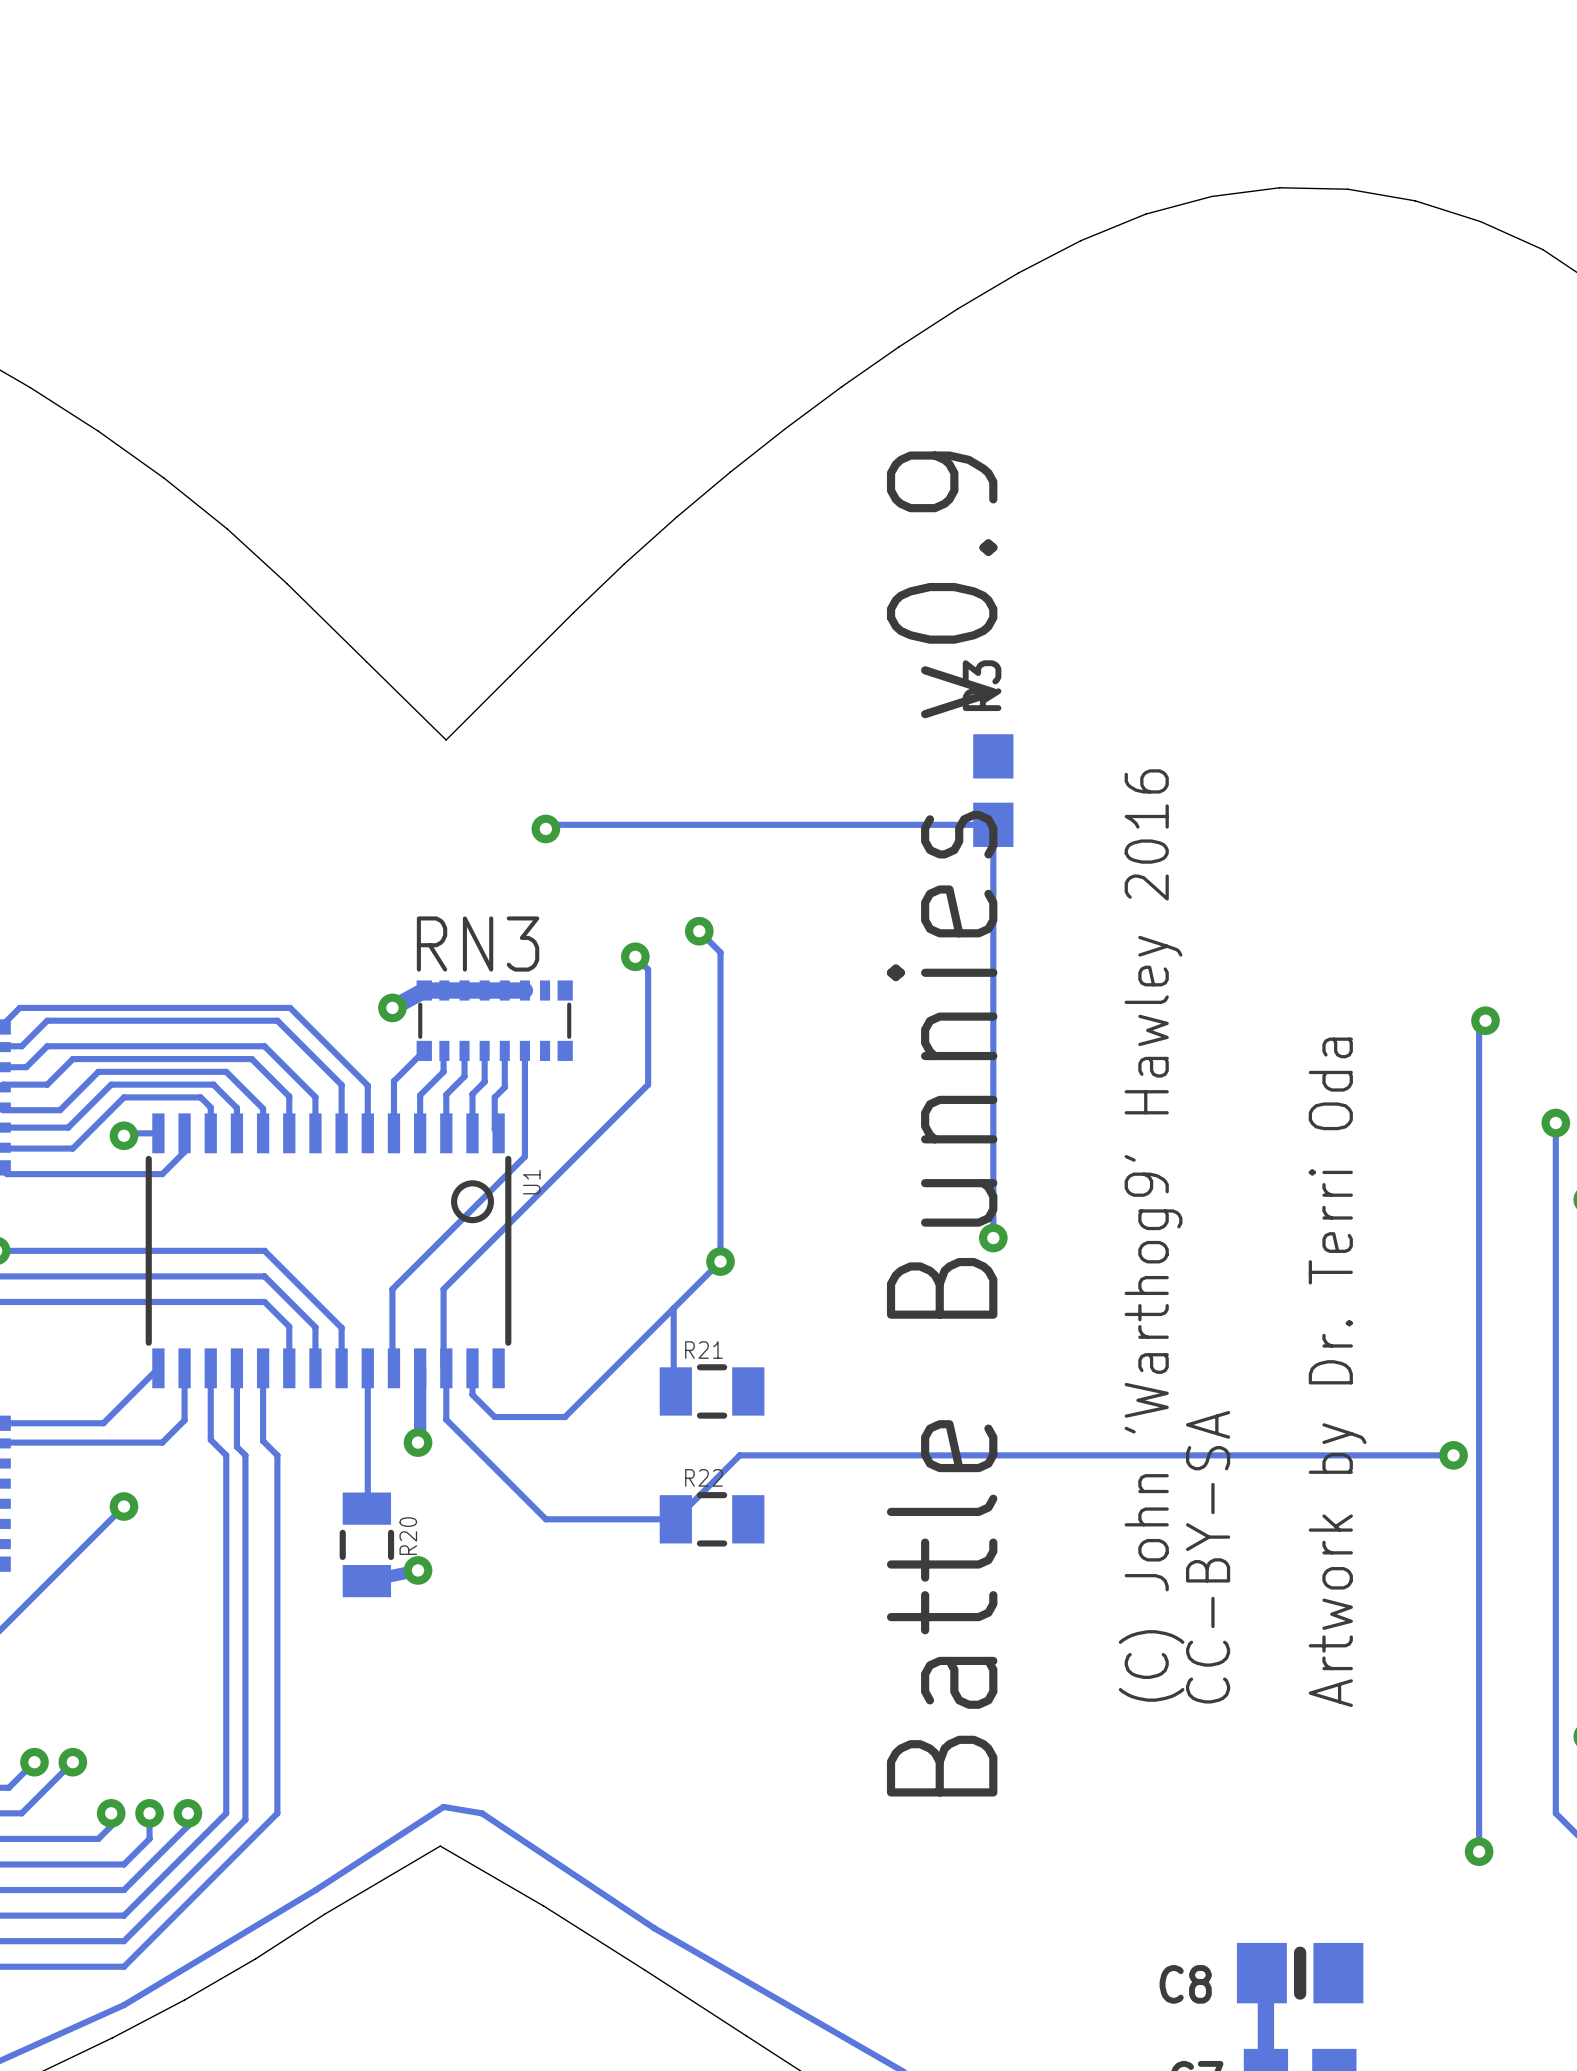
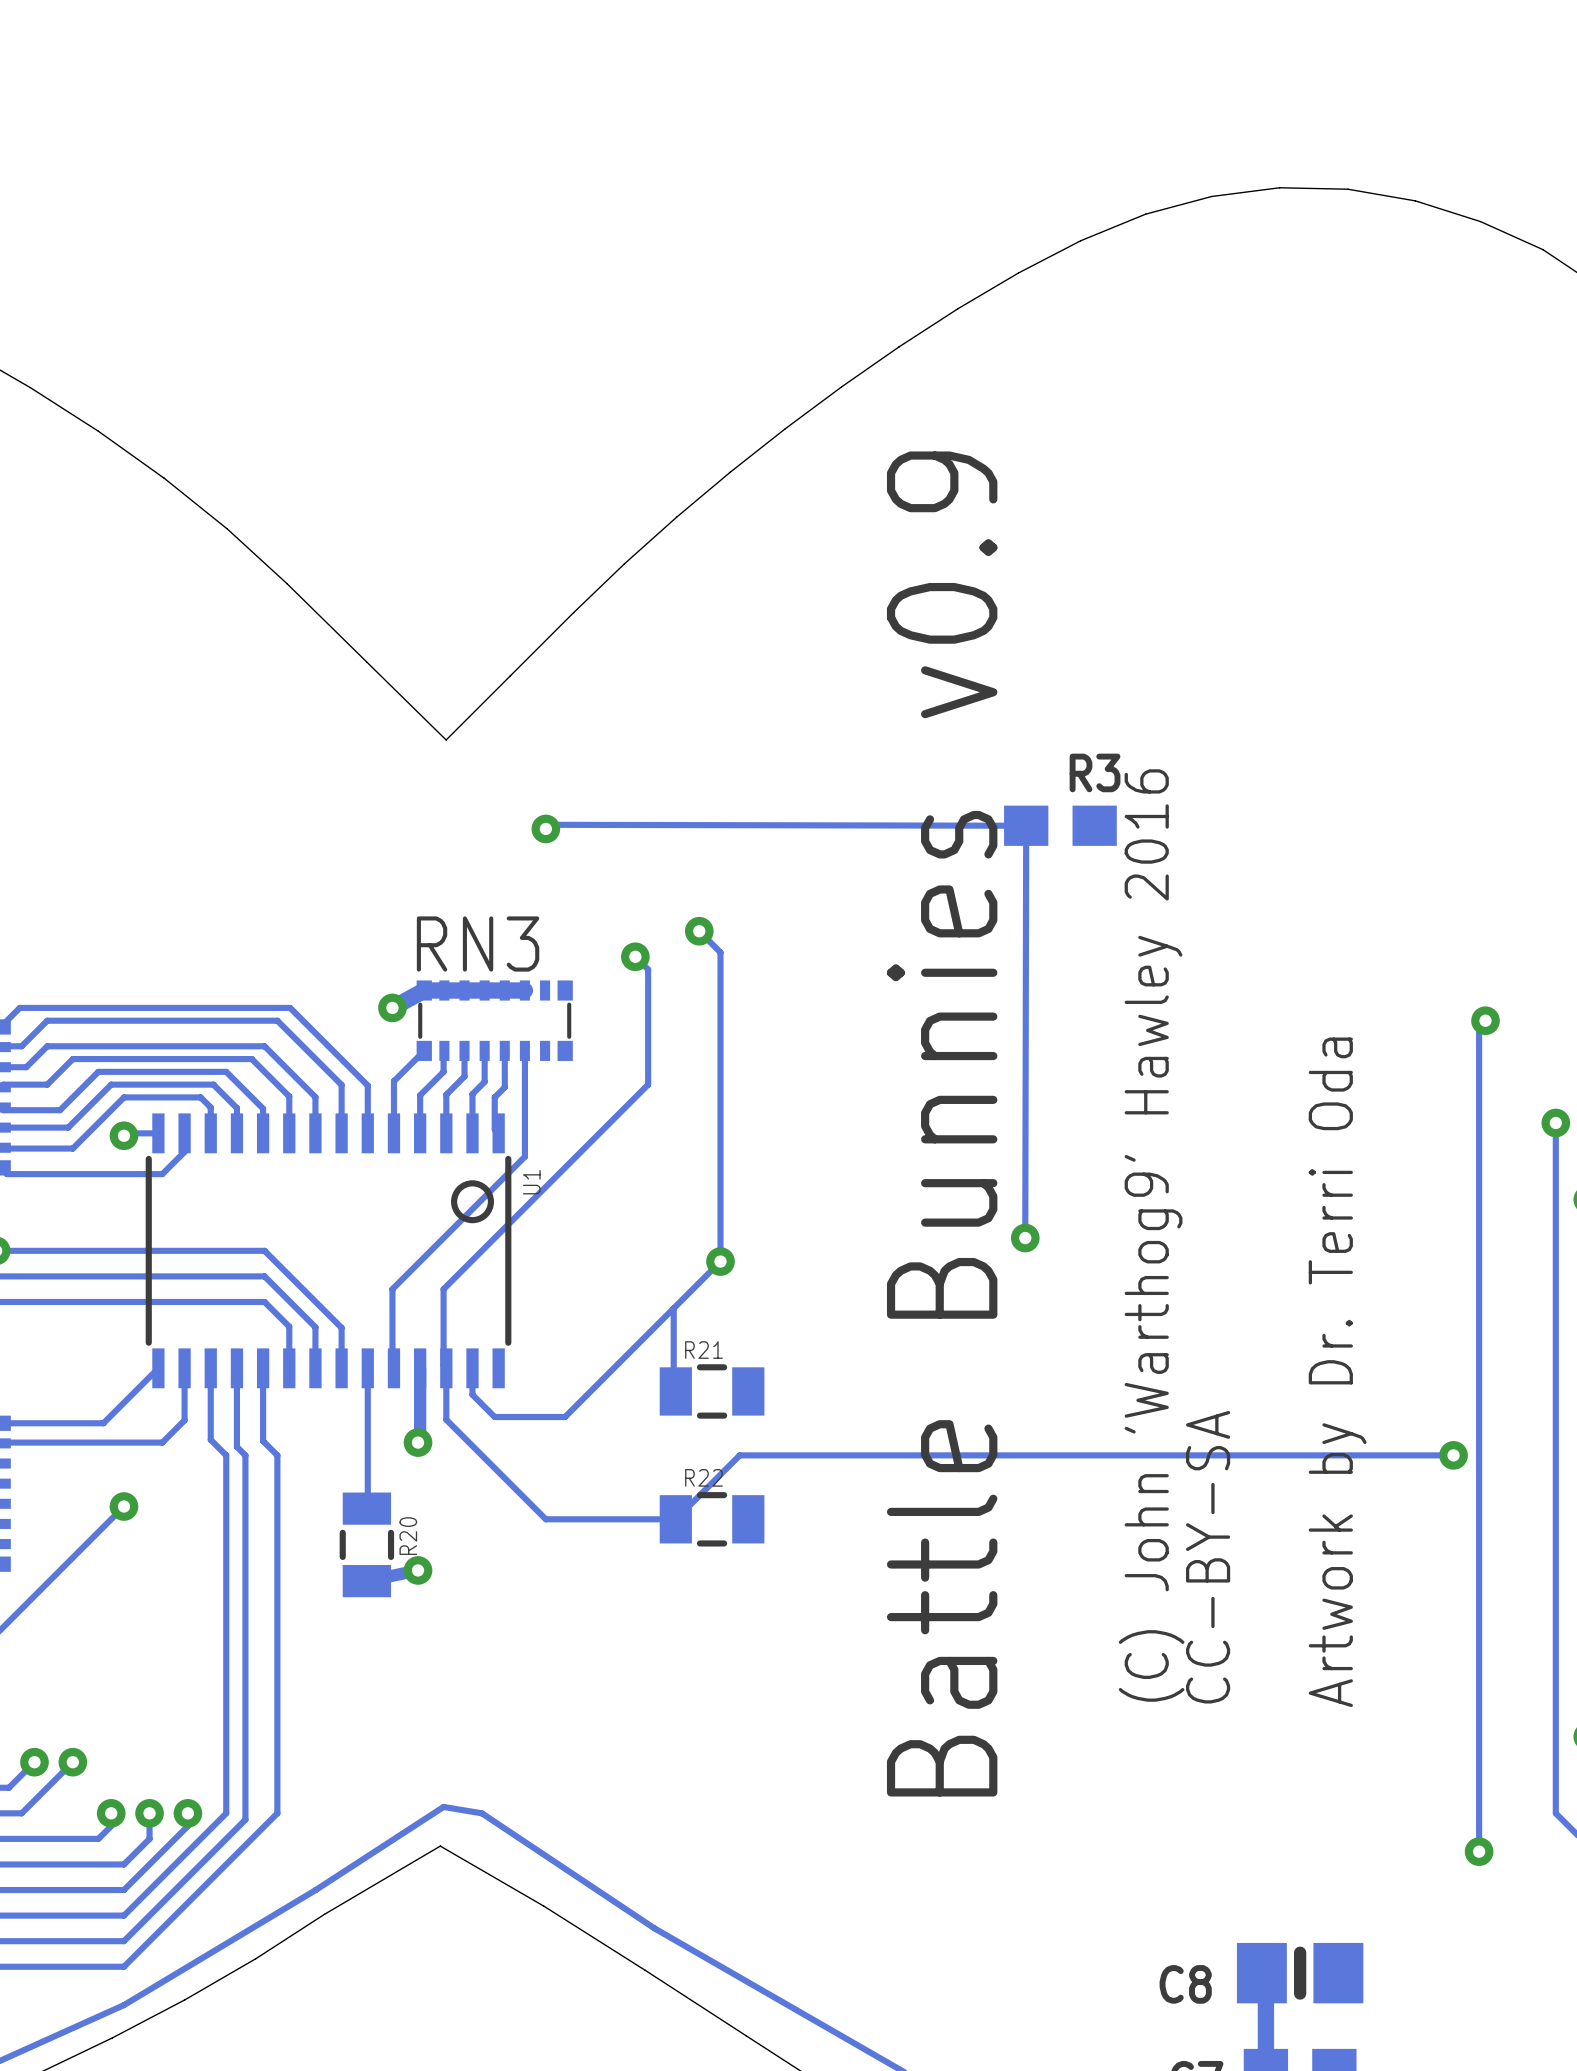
R3 rotation: 0° (993, 790) -> 90° clockwise (1060, 825)
R3 position: (993, 790) -> (1060, 825)
track: (549, 824) (993, 824) (993, 1238) -> (549, 824) (1026, 825) (1025, 1238)
via position: (993, 1238) -> (1025, 1238)

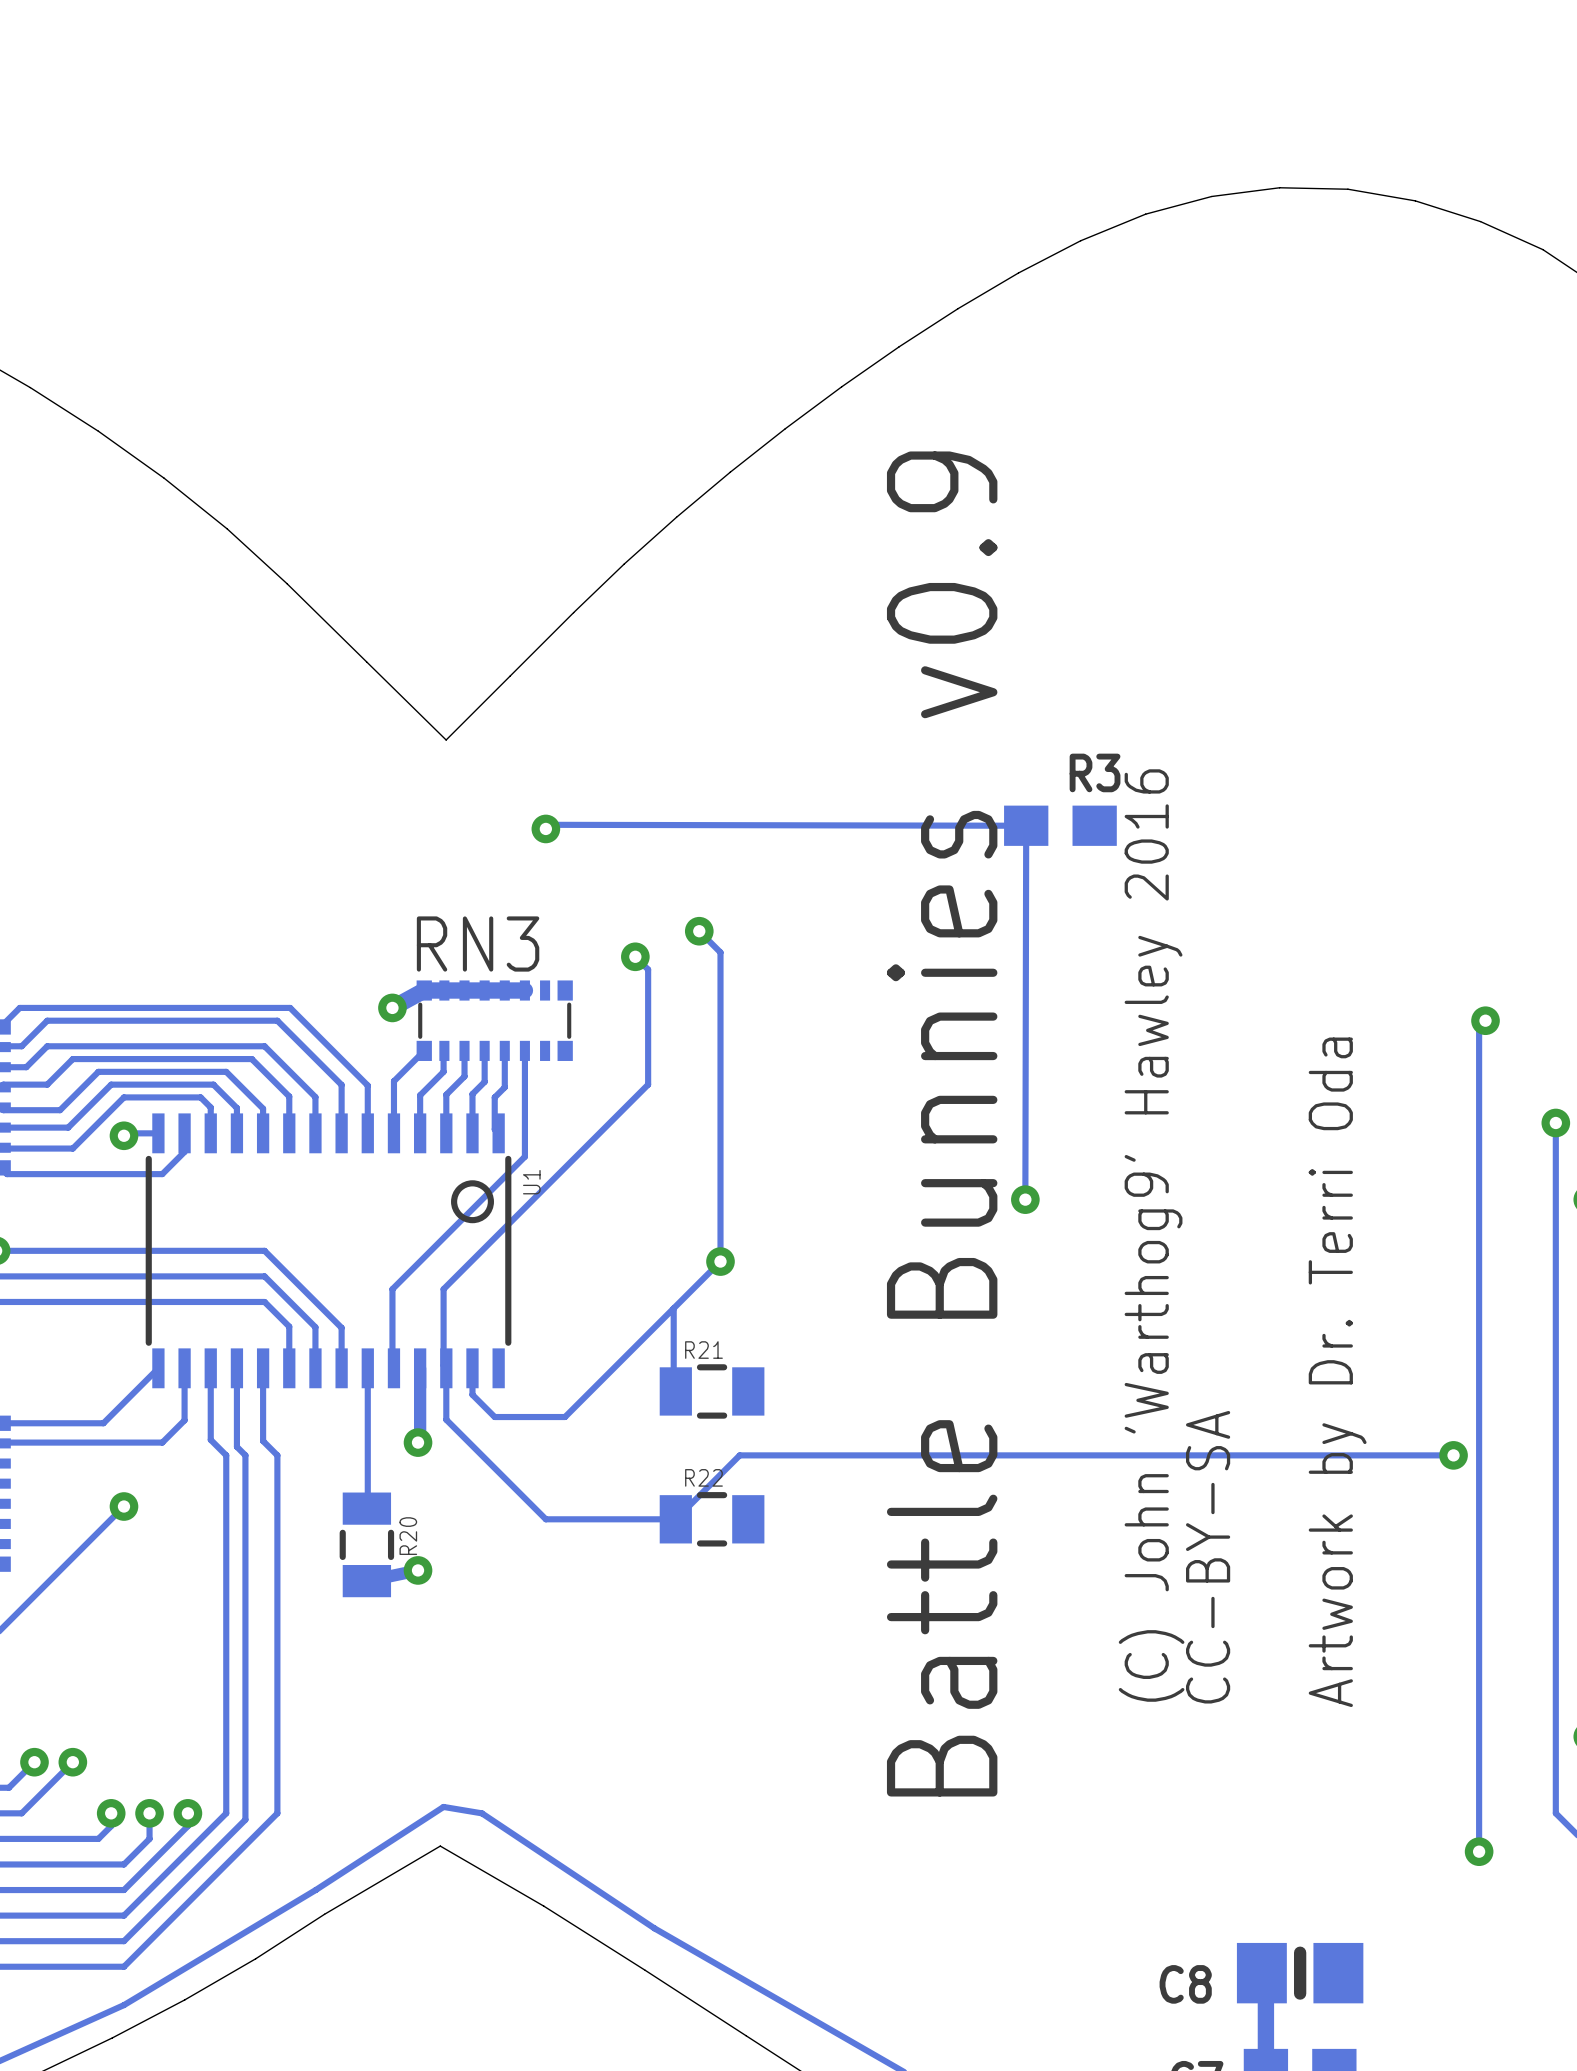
track: (1025, 1199) (1025, 1238) -> none
via position: (1025, 1238) -> (1025, 1199)

